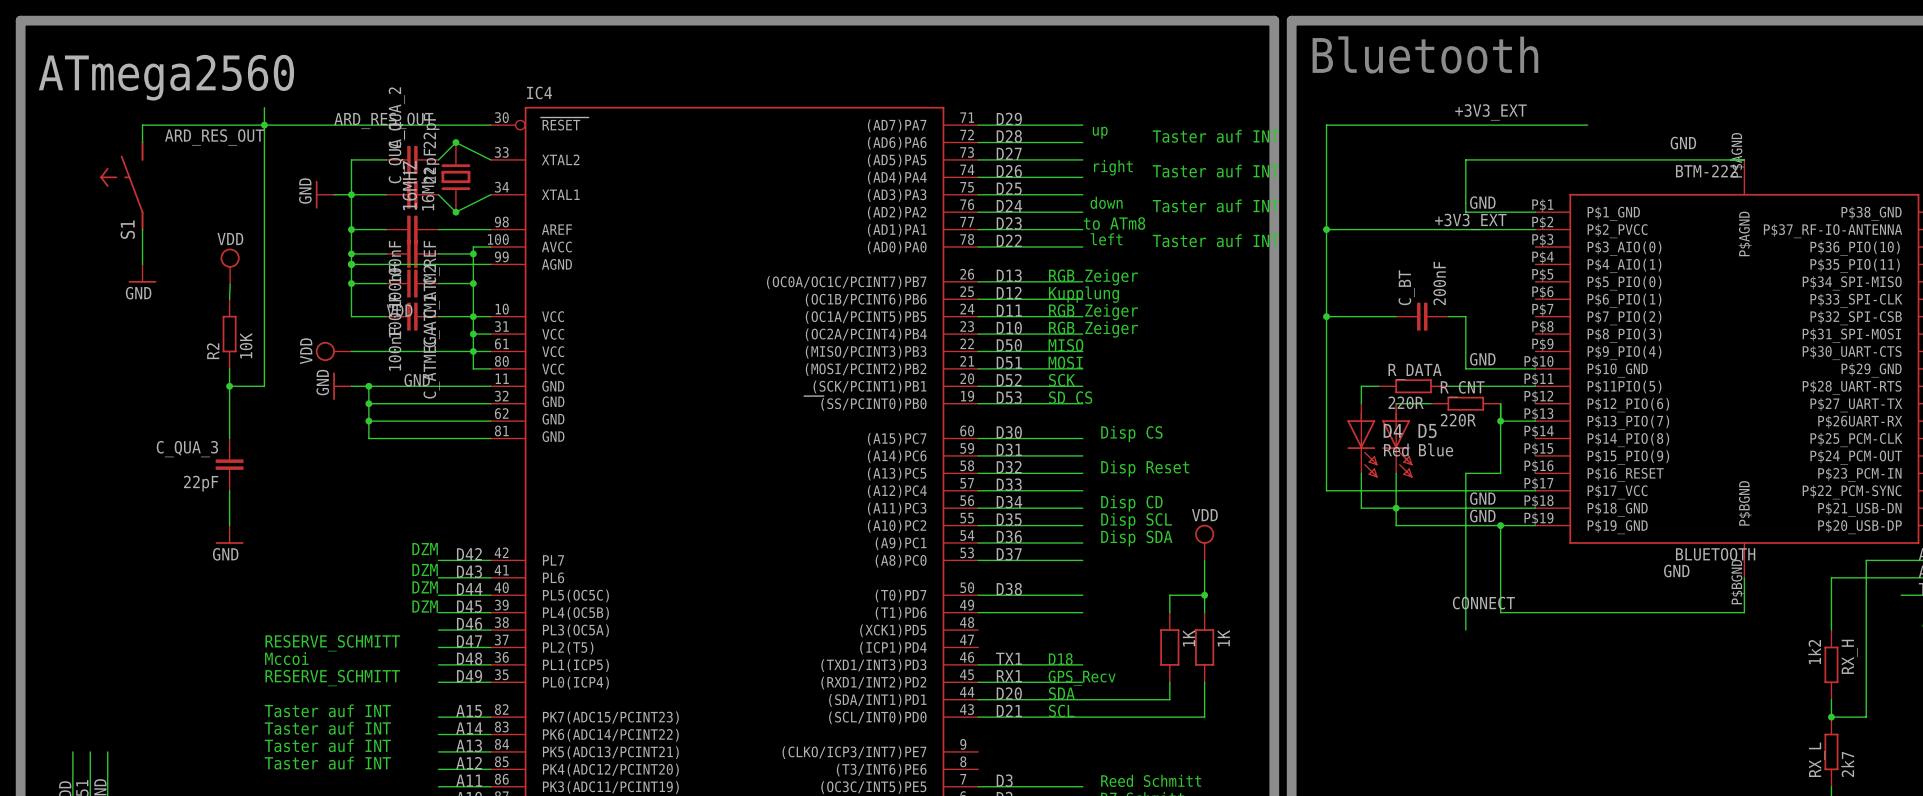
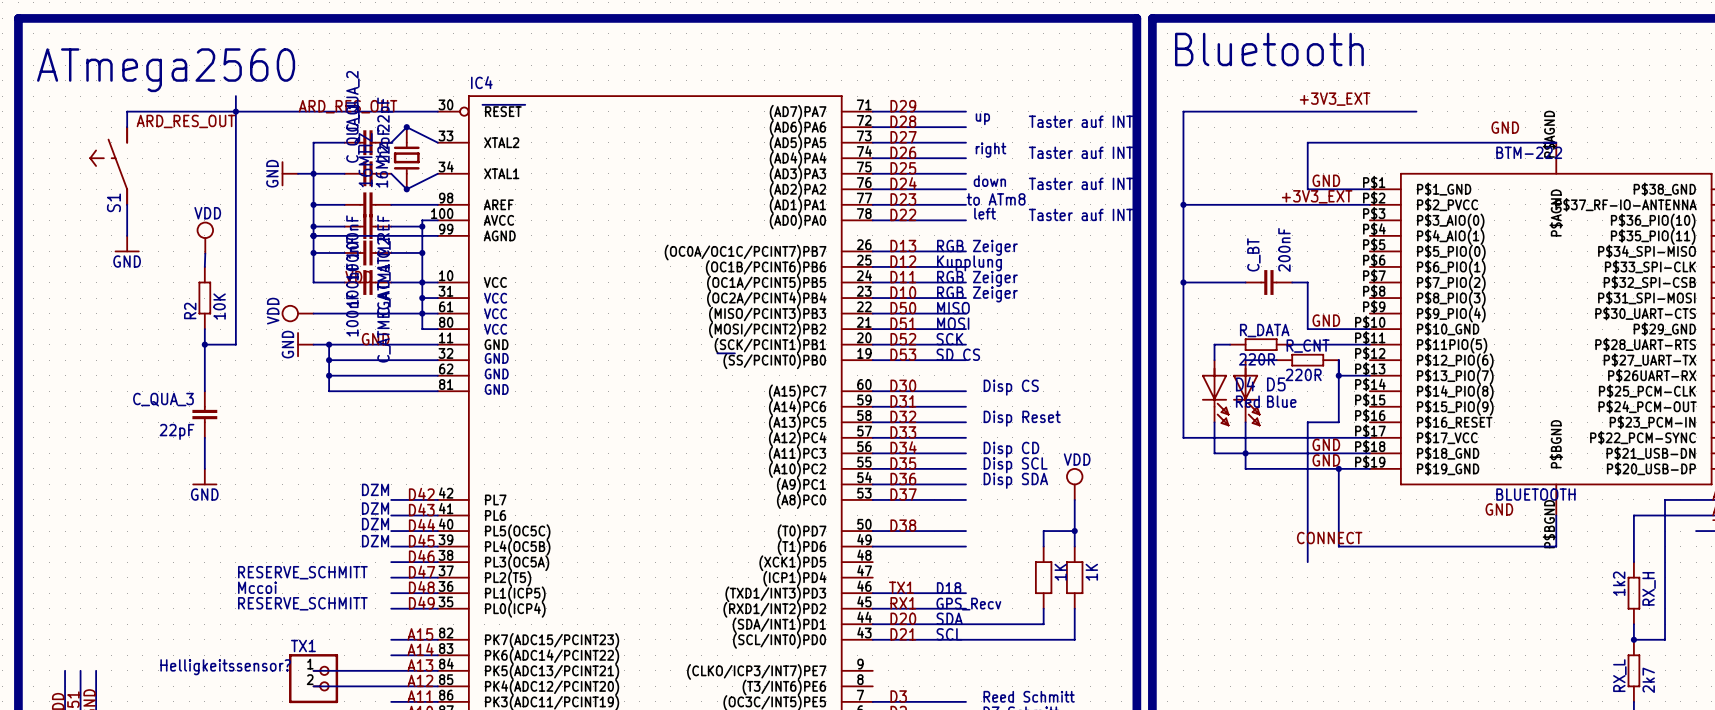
text: Taster auf INT (327, 710) -> none
text: Taster auf INT (327, 728) -> none
text: Taster auf INT (327, 745) -> none
text: none -> Helligkeitssensor? (225, 667)
wire: none -> (313, 670) (391, 670)
TX1: none -> (313, 678)
text: Taster auf INT (327, 763) -> none
wire: none -> (313, 686) (391, 686)

